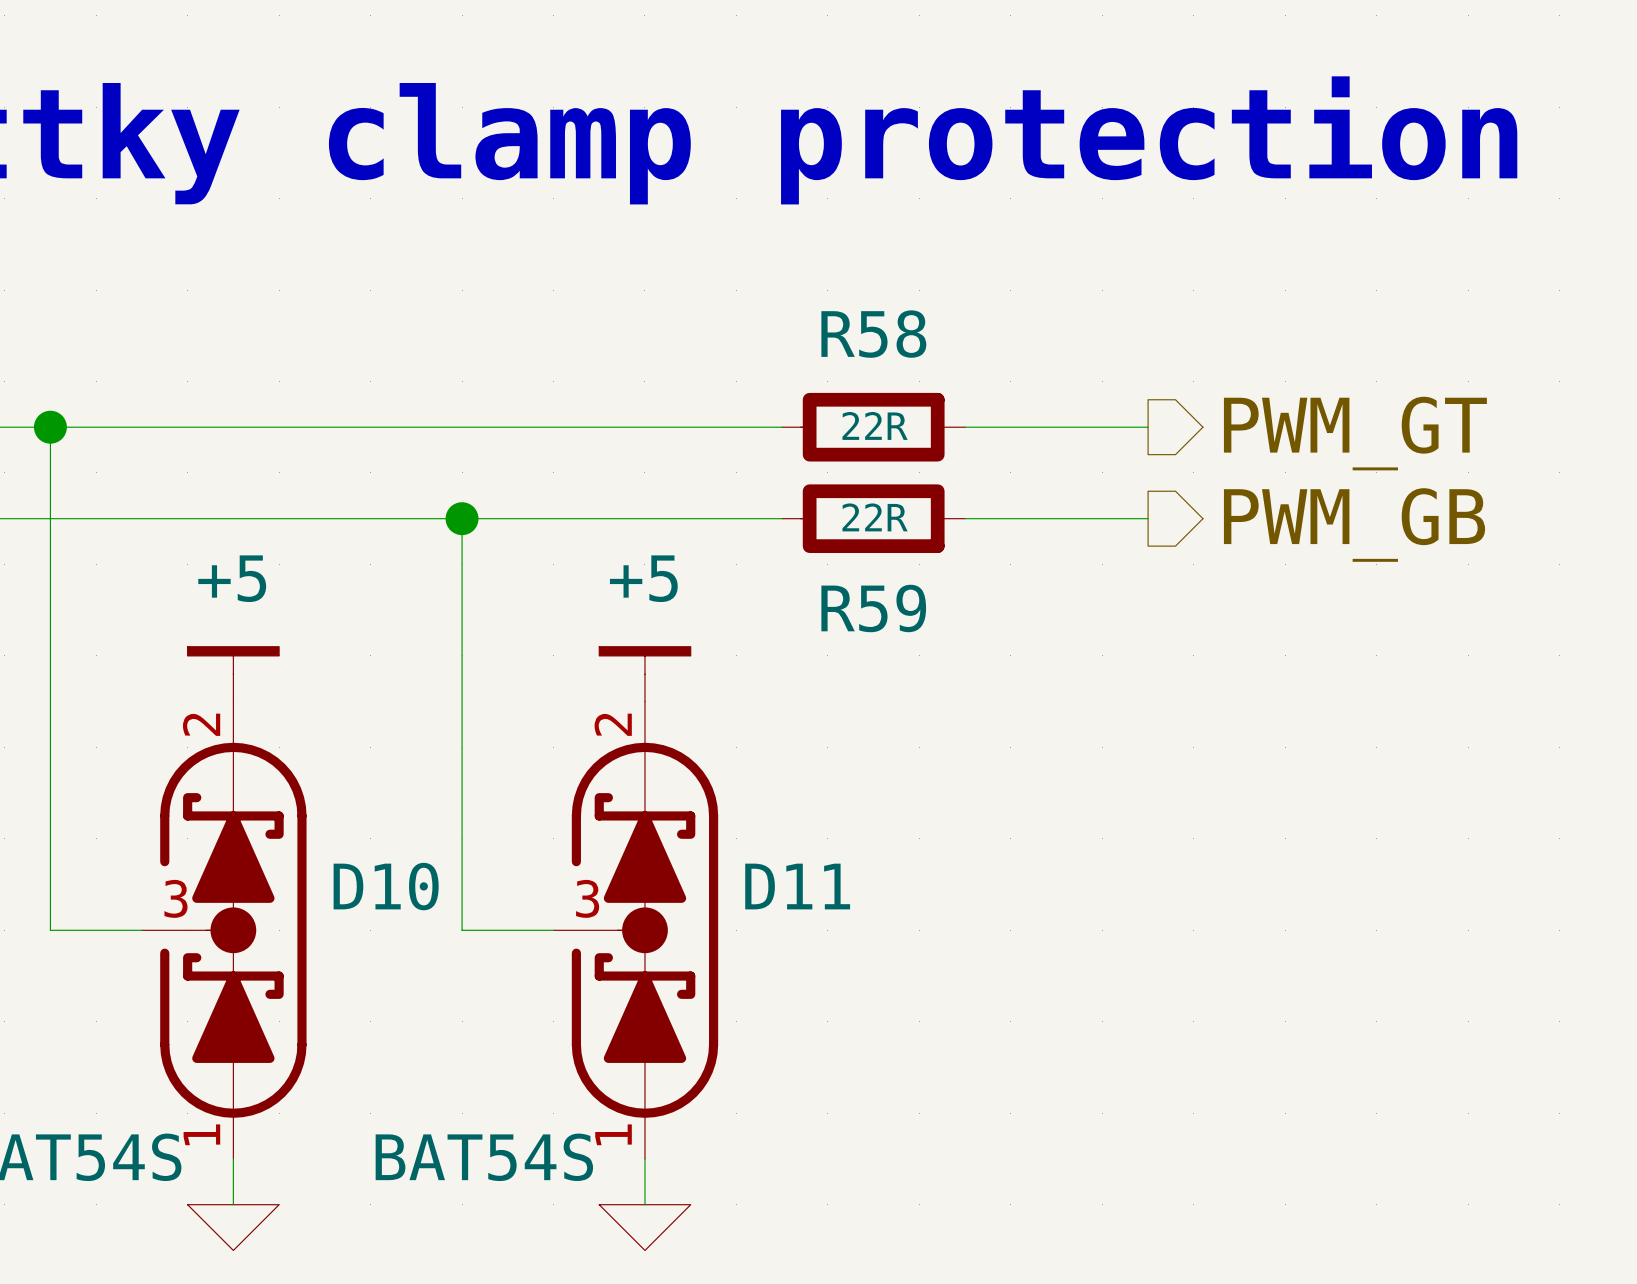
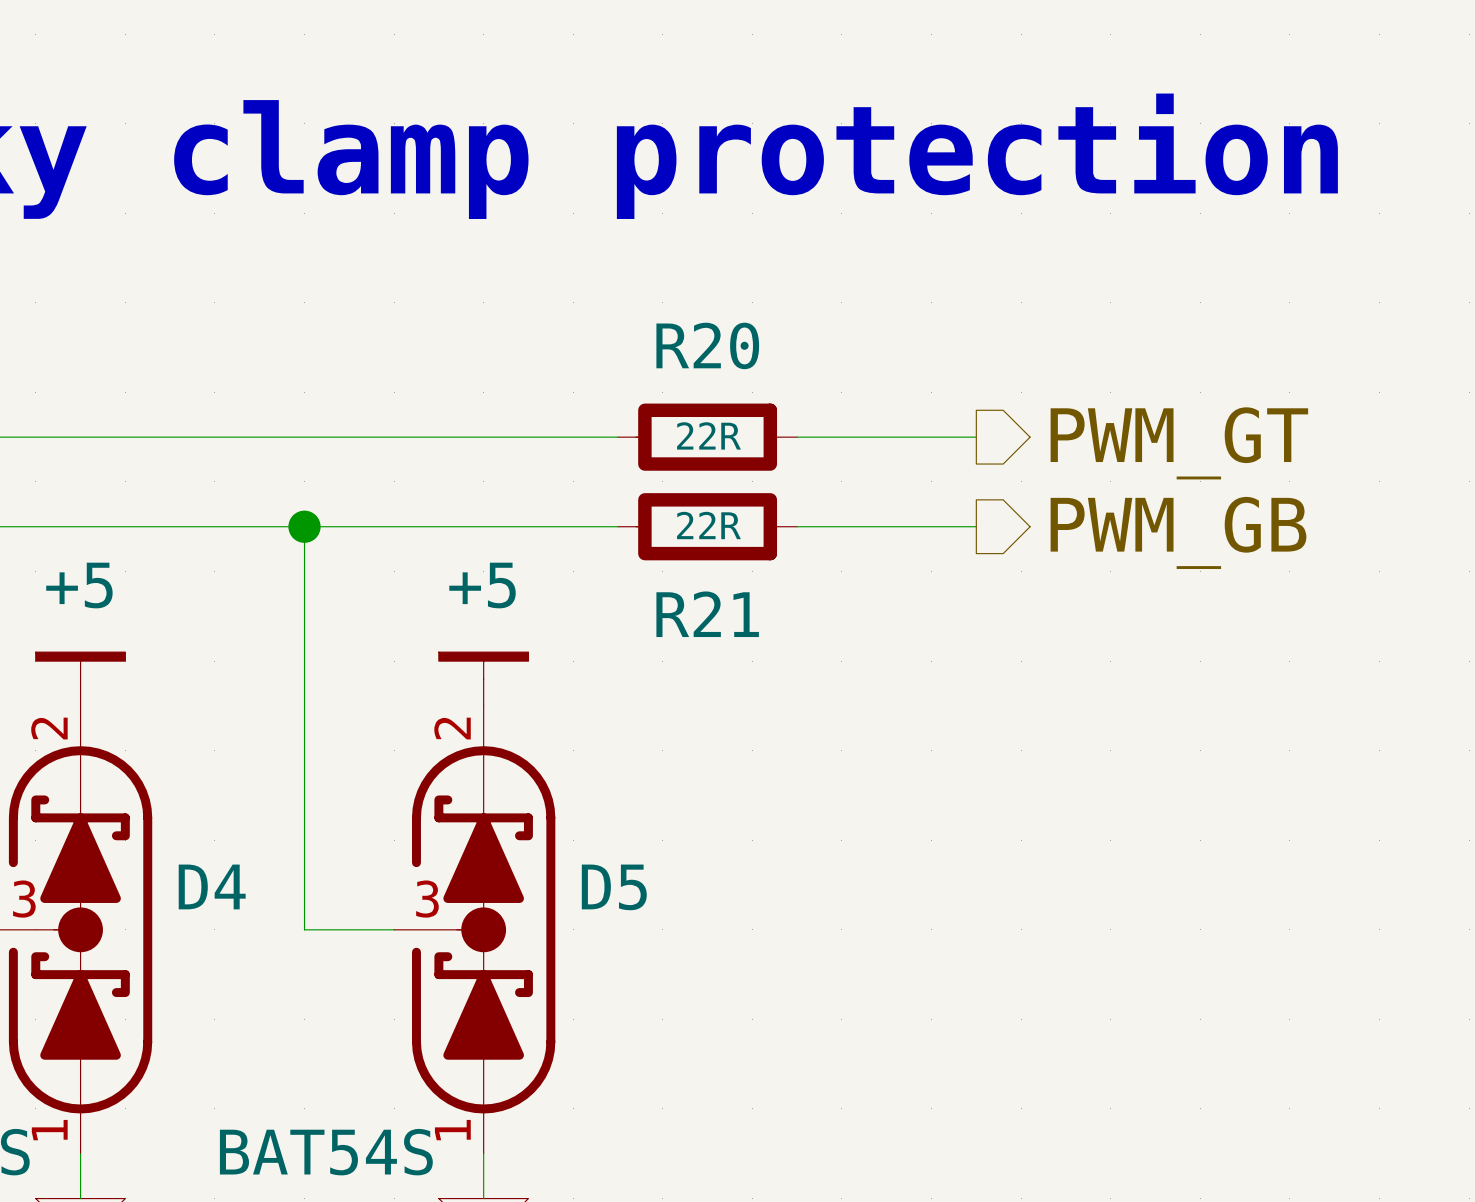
R58 name: R58 (873, 334) -> R20 (707, 345)
R59 name: R59 (873, 608) -> R21 (707, 614)
D10 name: D10 (386, 886) -> D4 (212, 886)
D11 name: D11 (797, 886) -> D5 (614, 887)

